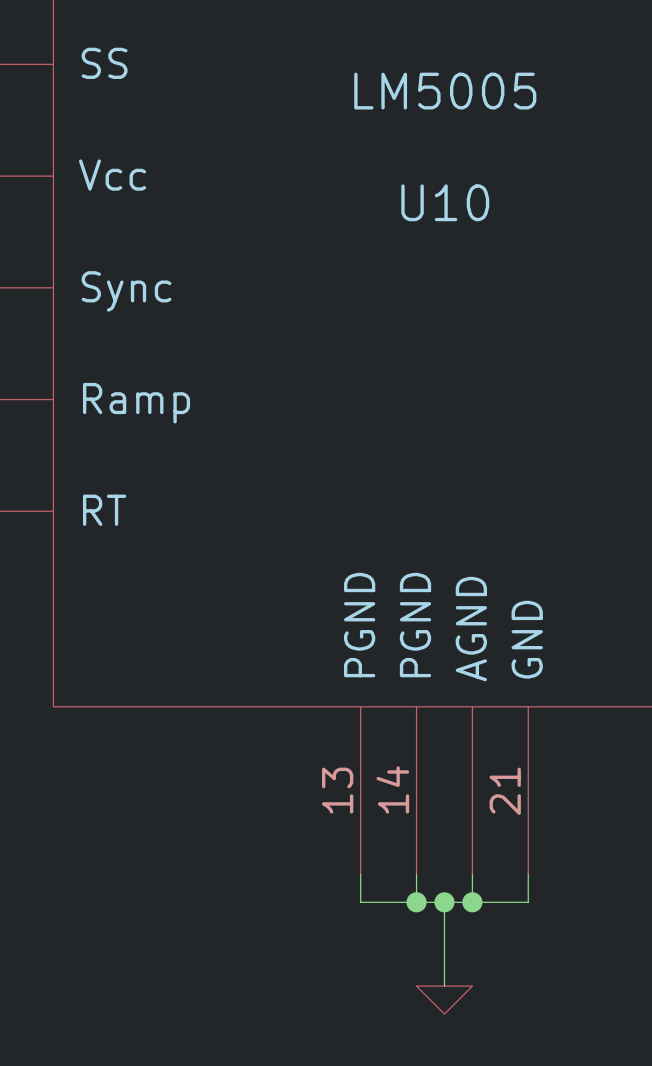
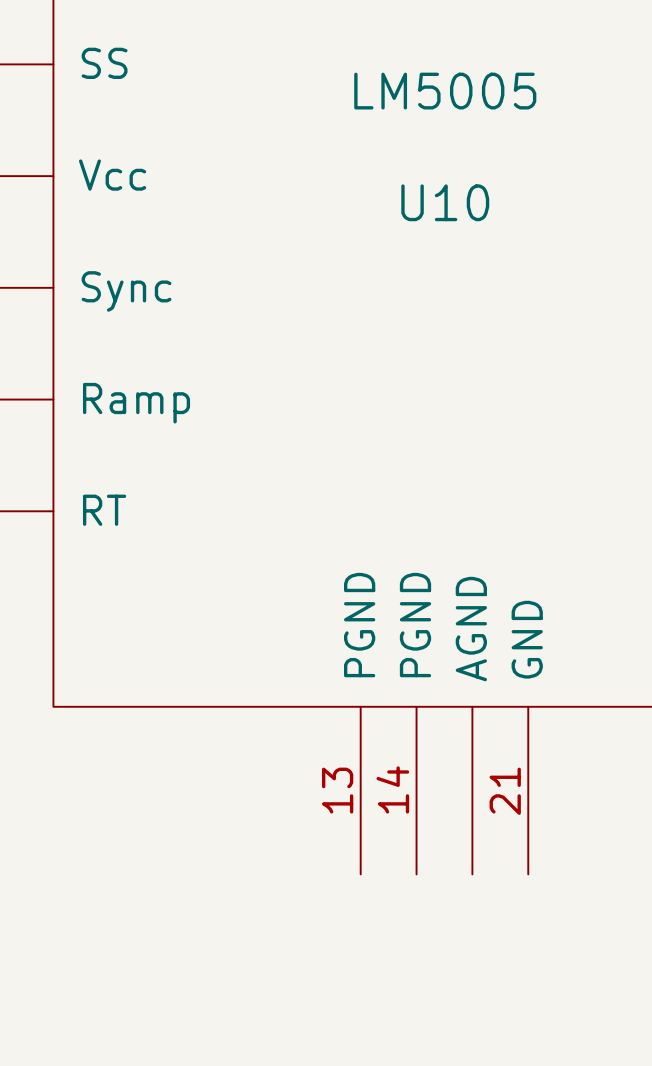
wire: (360, 874) (360, 902) (528, 902) (528, 874) -> none
wire: (416, 874) (416, 902) -> none
wire: (472, 874) (472, 902) -> none
junction: (416, 902) -> none
wire: (444, 902) (444, 986) -> none
junction: (444, 902) -> none
junction: (472, 902) -> none
power symbol: (444, 1000) -> none

